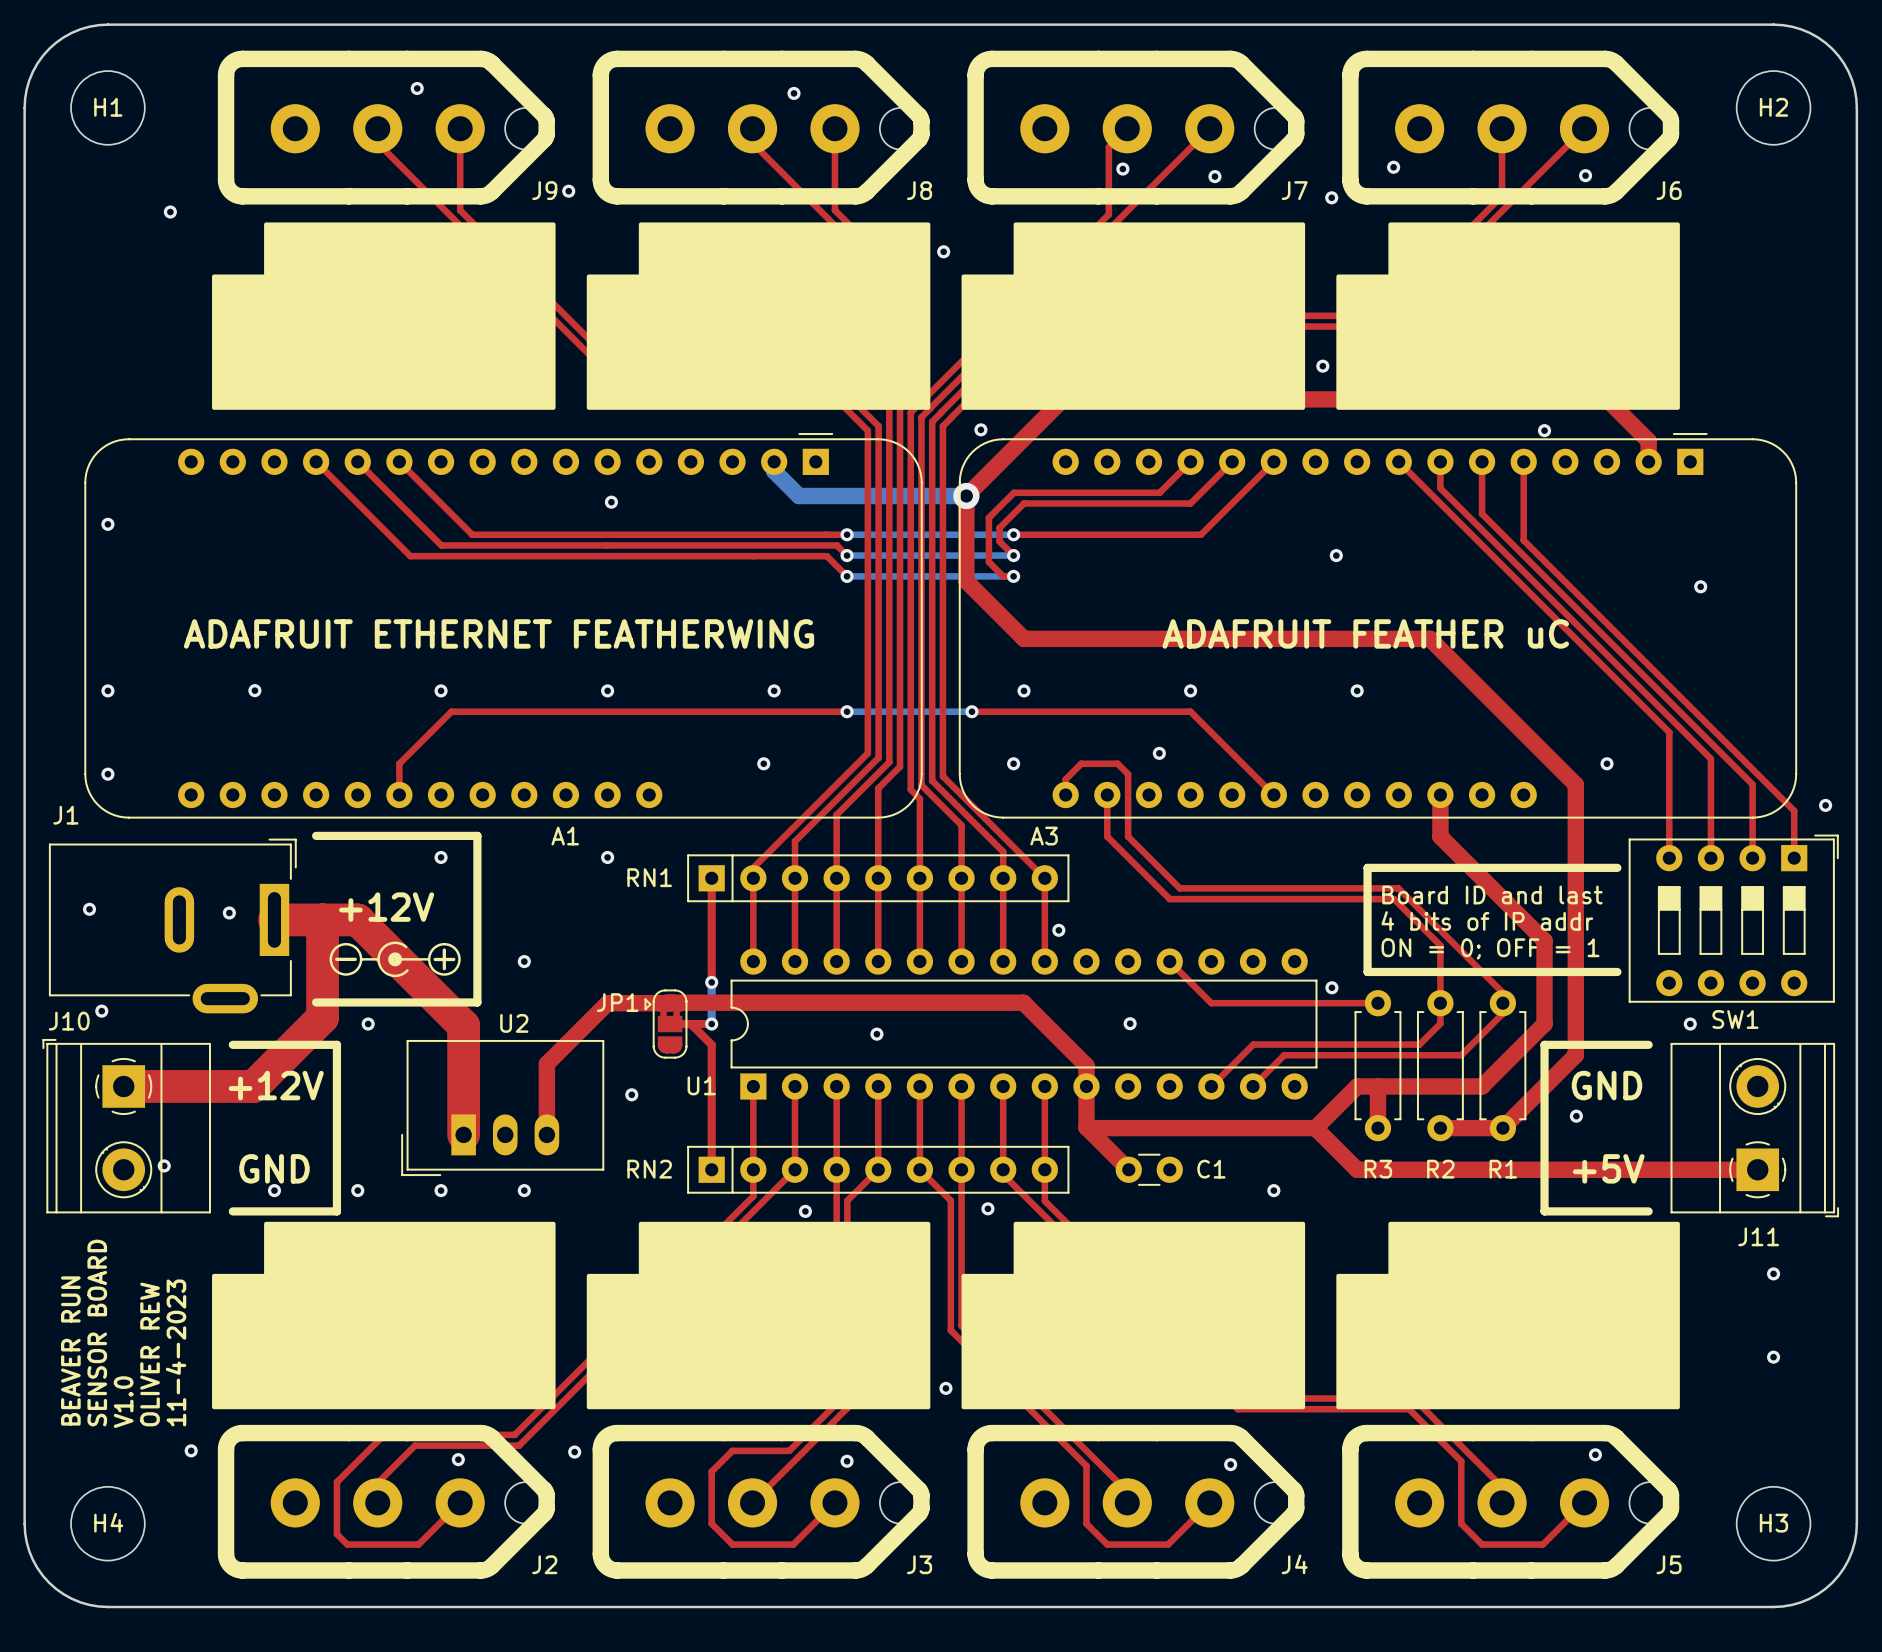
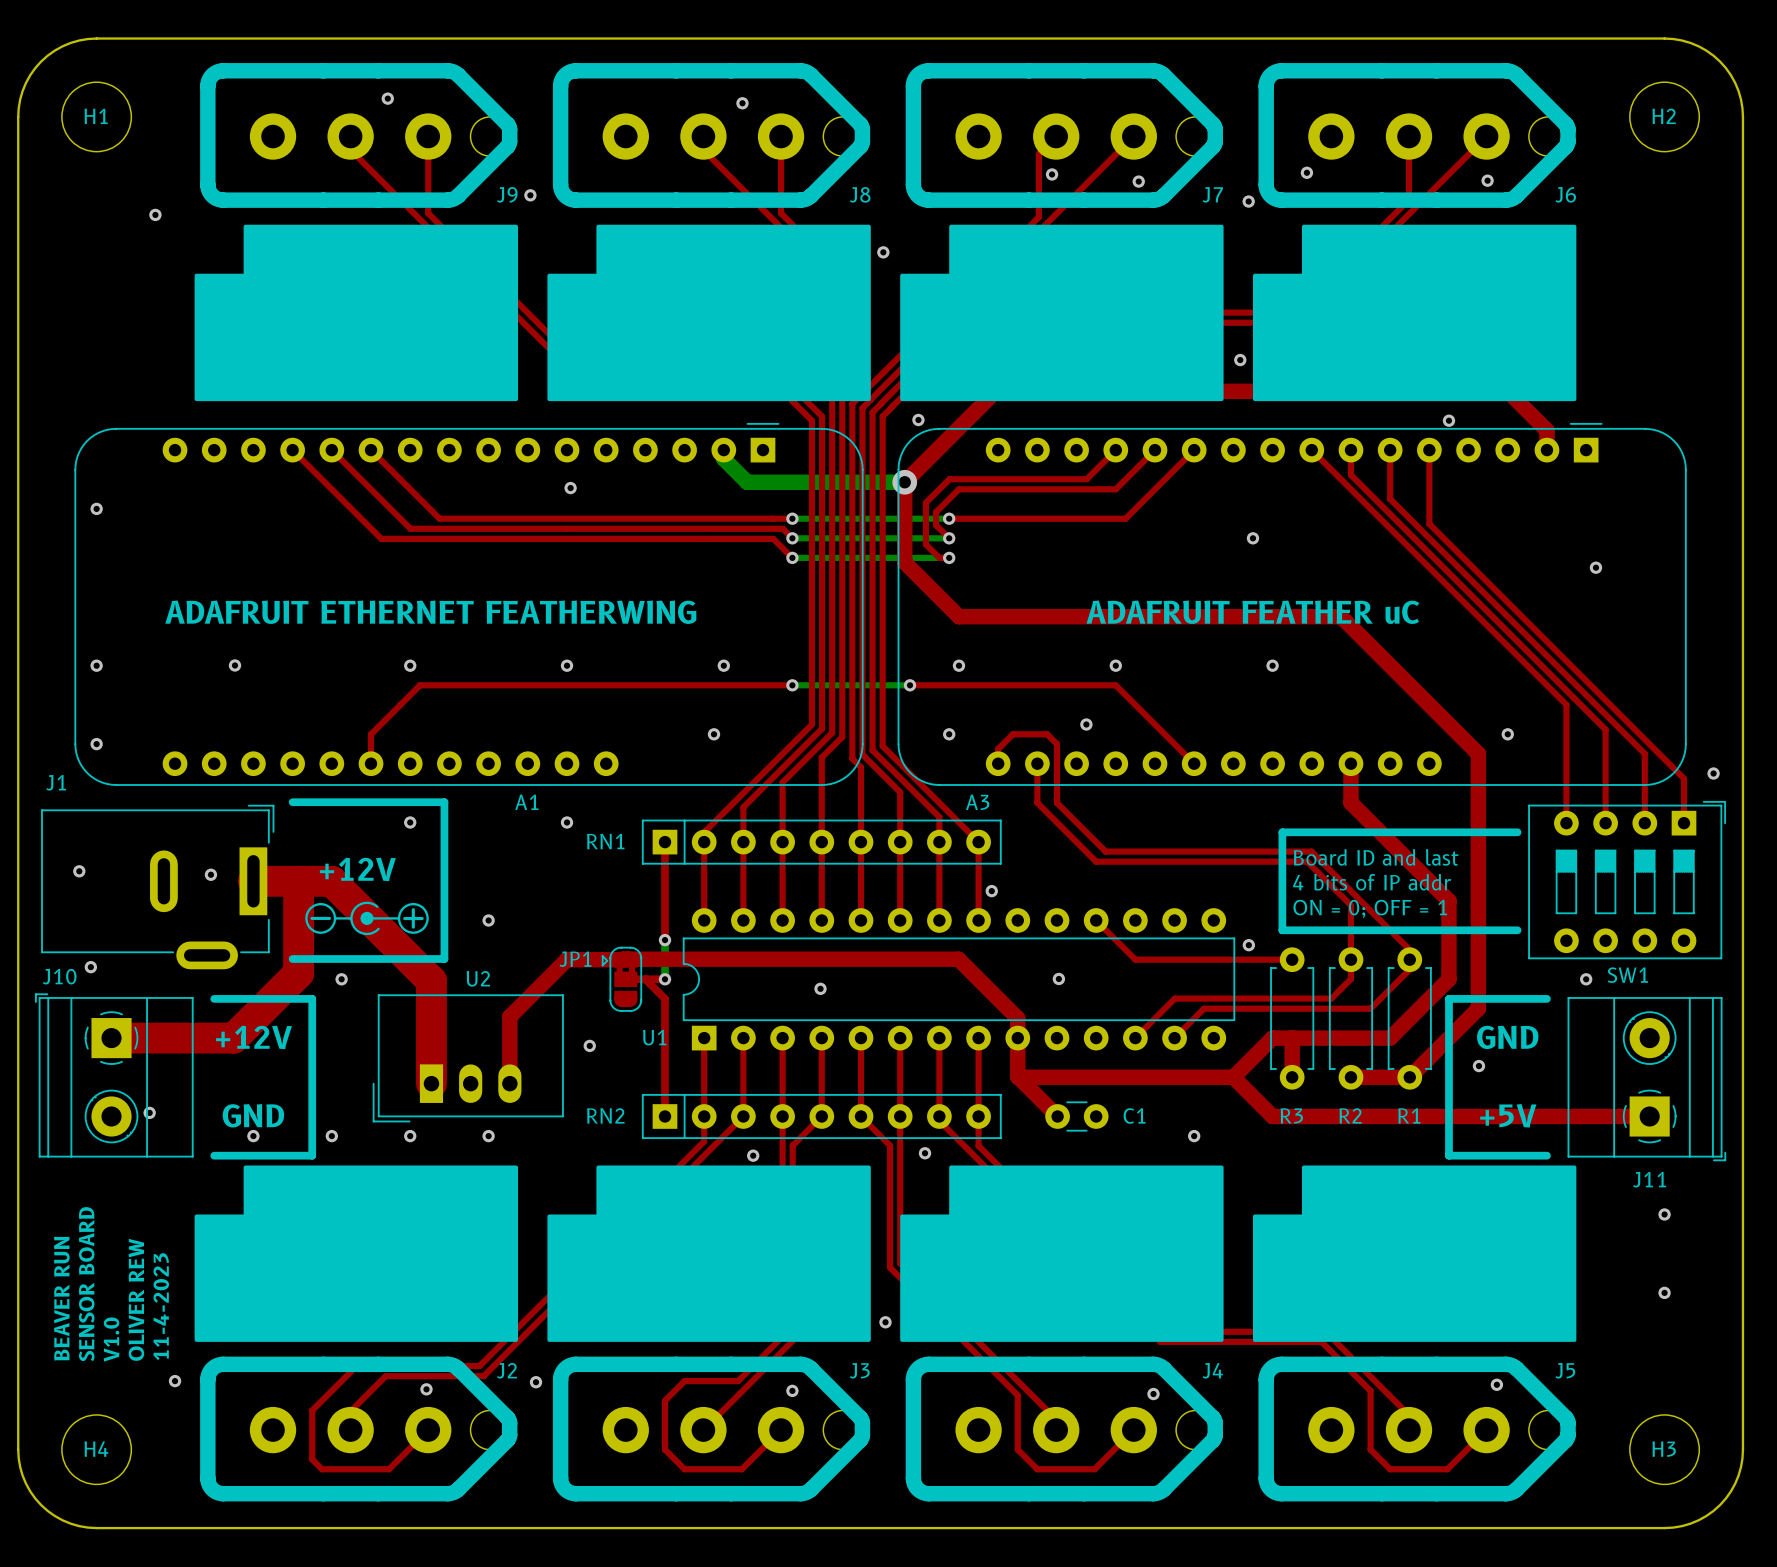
J2 name position: J2 (544, 1564) -> J2 (506, 1370)
J3 name position: J3 (919, 1564) -> J3 (859, 1370)
J4 name position: J4 (1294, 1564) -> J4 (1212, 1370)
J5 name position: J5 (1669, 1564) -> J5 (1565, 1370)

